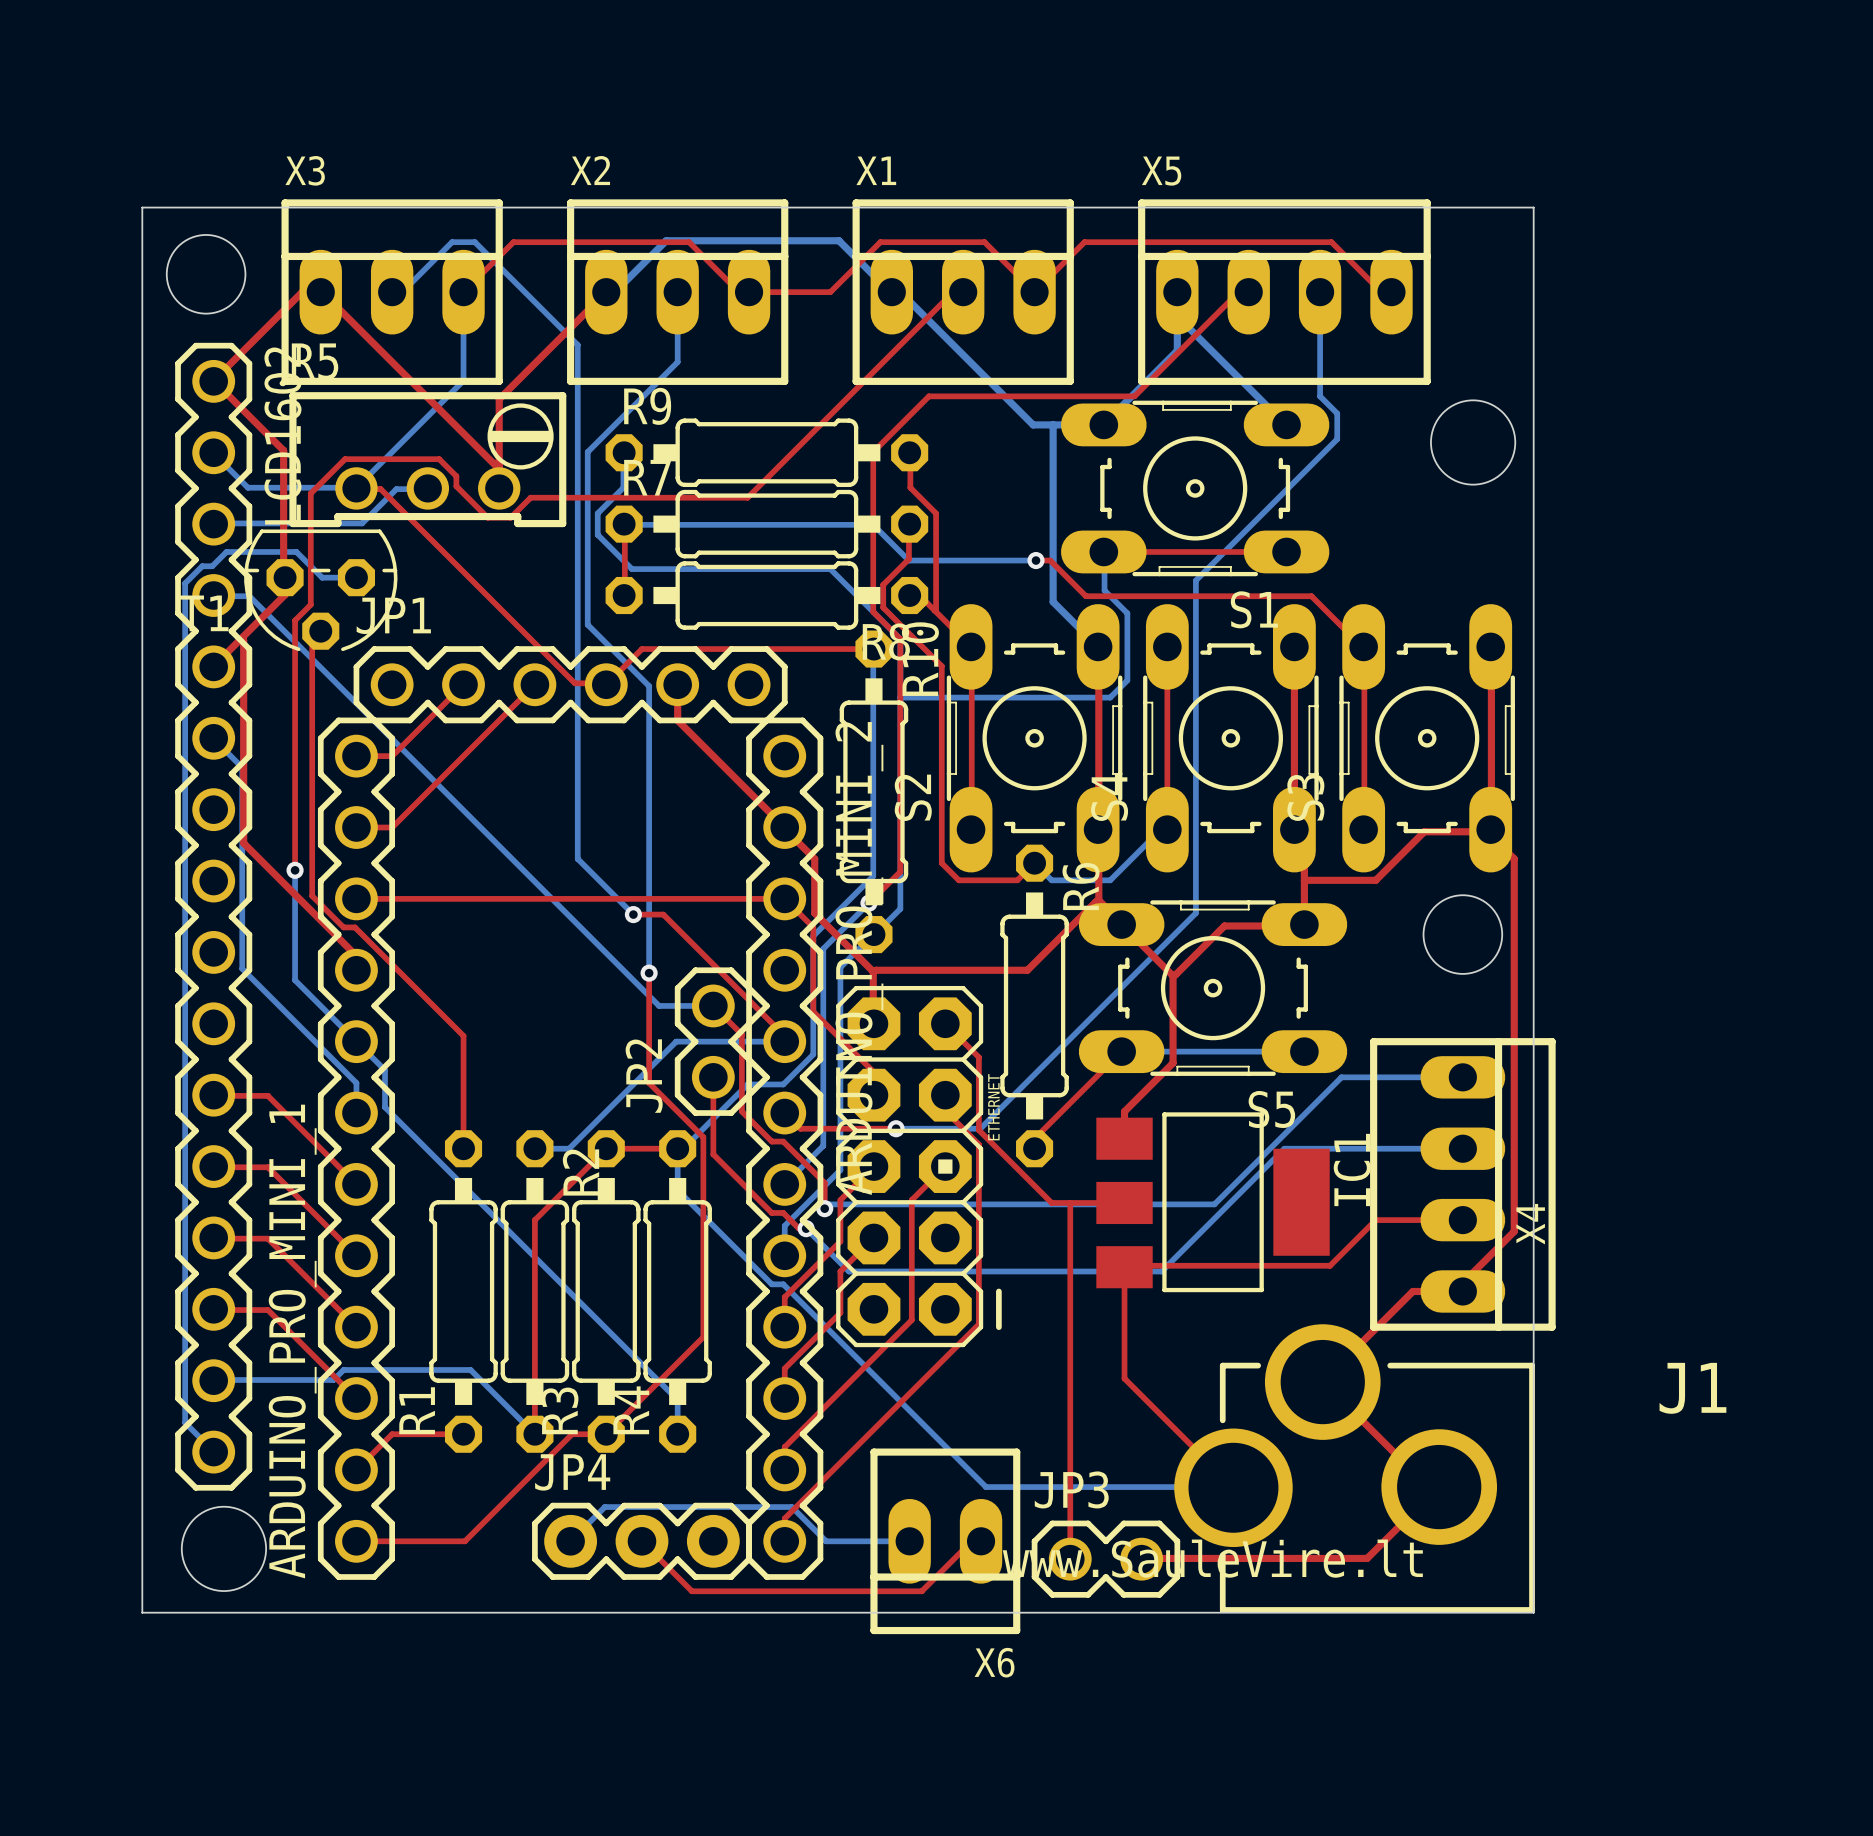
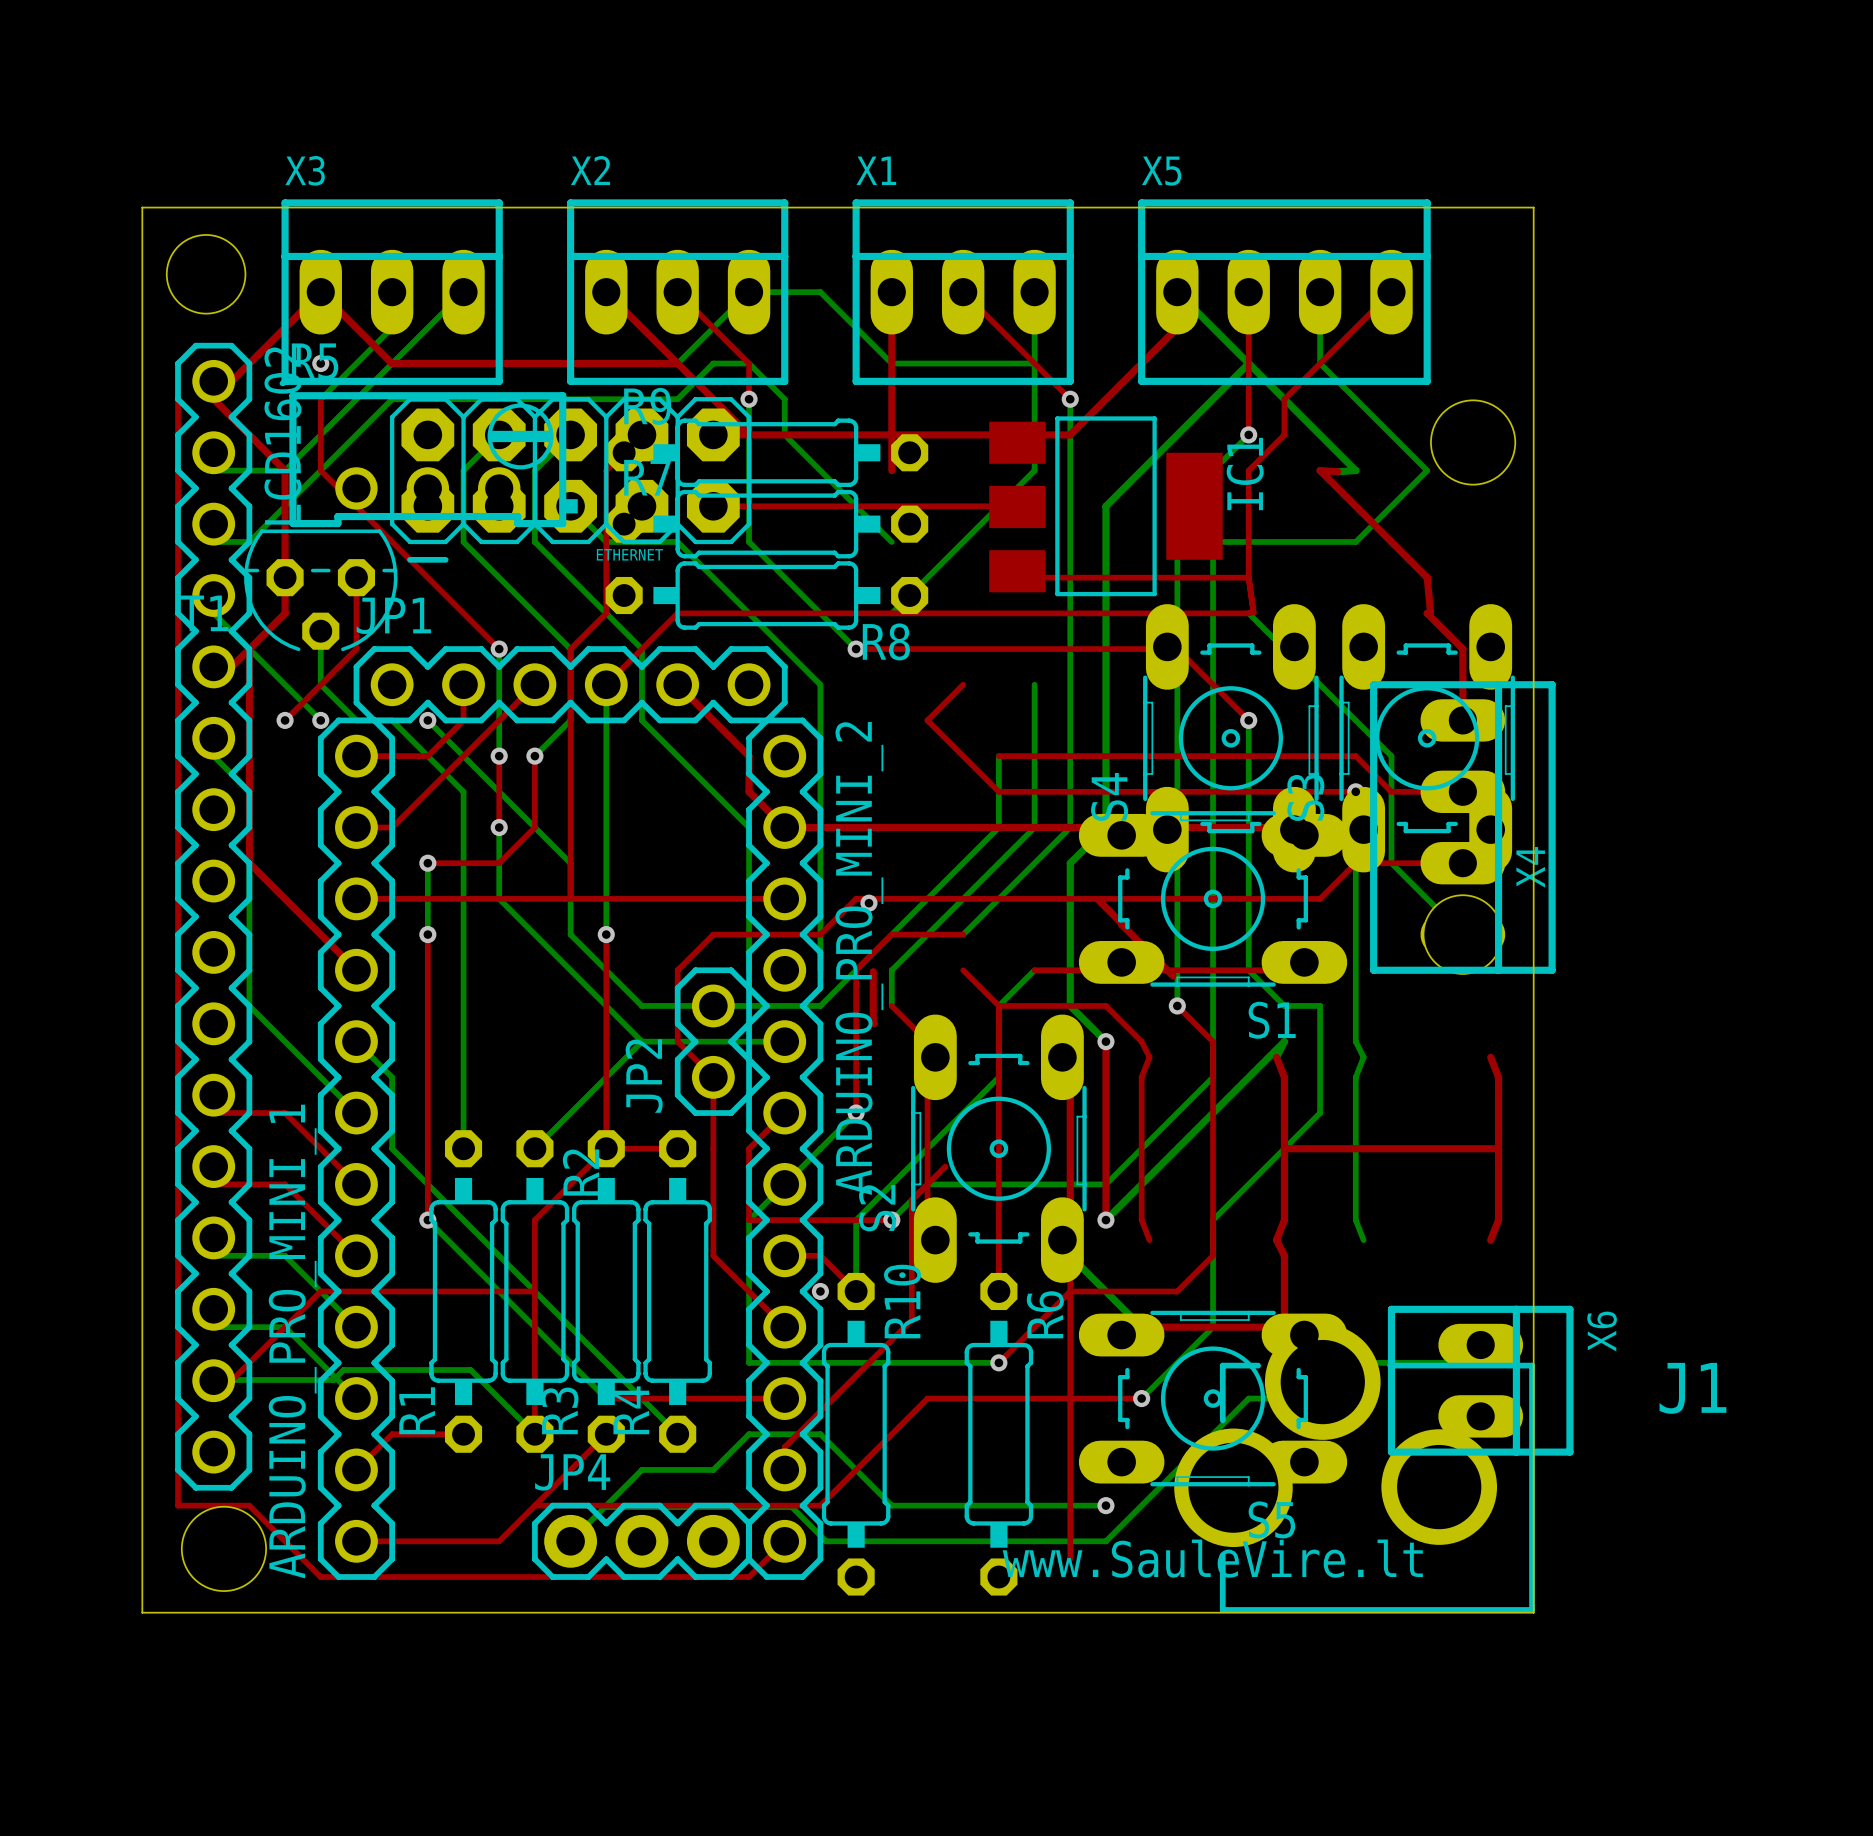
bottom track: (392, 292) (402, 292) (452, 242) (474, 242) (577, 344) (577, 858) (633, 914) -> (392, 292) (392, 327) (320, 399)
top track: (463, 292) (513, 242) (689, 242) (737, 290) (749, 292) (830, 292) (880, 242) (984, 242) (1034, 292) (1084, 242) (1331, 242) (1381, 292) (1391, 292) -> (1248, 577) (1248, 470) (1284, 434) (1284, 399) (1391, 292)
bottom track: (463, 292) (463, 380) (356, 488) (247, 487) (213, 452) -> (463, 292) (285, 470) (213, 470)
top track: (606, 292) (499, 399) (499, 488) -> (606, 292) (749, 434)
bottom track: (606, 292) (614, 292) (666, 240) (838, 240) (888, 290) (900, 292) (1033, 424) (1103, 424) (1177, 350) (1177, 292) (1180, 319) (1286, 424) -> none
top track: none -> (677, 292) (749, 363) (749, 399)
bottom track: (677, 292) (677, 362) (587, 452) (587, 624) (649, 686) (649, 973) -> none
top track: none -> (891, 292) (891, 470)
top track: (963, 292) (953, 292) (747, 497) (530, 497) (510, 517) (487, 517) (456, 486) (456, 476) (439, 459) (345, 459) (310, 493) (310, 604) (295, 620) (295, 870) -> (963, 292) (1070, 399)
bottom track: none -> (1034, 292) (1034, 470) (891, 613)
top track: none -> (1177, 292) (1177, 327) (1070, 434) (1034, 434) (1017, 442) (998, 434) (713, 434)
bottom track: none -> (1177, 292) (1355, 470) (1337, 471)
top track: (1248, 292) (1238, 292) (1134, 396) (928, 396) (873, 452) (873, 611) (900, 639) (900, 871) (868, 903) -> (1248, 292) (1248, 434)
via: none -> (320, 363)
bottom track: none -> (392, 363) (677, 363) (749, 292) (820, 292) (891, 363) (1034, 363)
bottom track: none -> (1248, 363) (1105, 506) (1105, 827)
bottom track: (1320, 363) (1320, 396) (1337, 413) (1337, 439) (1195, 580) (1195, 913) (980, 1128) (896, 1128) -> (1320, 363) (1427, 470) (1355, 541) (1213, 541) (1213, 1077) (1105, 1184) (927, 1184) (891, 1220)
top track: none -> (320, 399) (320, 470) (499, 649)
bottom track: none -> (749, 399) (749, 541) (856, 649)
via: none -> (749, 399)
bottom track: none -> (1070, 399) (1070, 827) (963, 934)
via: none -> (1070, 399)
bottom track: (1053, 424) (1053, 601) (1098, 646) -> none
bottom track: none -> (499, 434) (463, 470) (463, 541) (570, 649) (570, 720) (534, 756)
bottom track: none -> (570, 434) (534, 470) (534, 541) (641, 649) (641, 720) (749, 827) (749, 970)
top track: none -> (641, 434) (606, 470) (606, 613) (570, 649) (570, 898)
bottom track: none -> (1248, 434) (1177, 506) (1177, 1005)
via: none -> (1248, 434)
bottom track: (624, 452) (623, 487) (597, 513) (597, 534) (631, 569) (830, 569) (900, 639) (900, 908) (840, 967) (840, 1170) (784, 1225) (784, 1255) -> none
top track: (909, 452) (910, 487) (936, 513) (934, 610) -> none
top track: (499, 466) (496, 466) (323, 293) (302, 292) (213, 380) (283, 450) (285, 577) -> (677, 363) (392, 363) (320, 292) (213, 399) (285, 470) (285, 577)
top track: none -> (1337, 471) (1320, 470) (1427, 577) (1430, 612) (1427, 613) (1462, 649) (1462, 720)
ETHERNET: none -> (570, 479)
top track: (356, 488) (380, 489) (574, 683) (606, 684) -> none
bottom track: (427, 488) (396, 489) (362, 523) (213, 524) -> none
S1 position: (1195, 488) -> (1213, 898)
bottom track: none -> (570, 506) (606, 541) (677, 541) (820, 684) (820, 970)
top track: none -> (713, 506) (1017, 507)
top track: (624, 524) (624, 595) -> none
bottom track: (624, 524) (873, 524) (908, 560) (1036, 560) -> none
top track: (909, 524) (908, 559) (883, 584) (883, 607) (941, 666) (941, 863) (958, 880) (1017, 880) (1034, 863) -> none
bottom track: none -> (213, 541) (249, 541) (392, 399) (677, 399) (713, 363) (749, 363) (784, 399) (784, 434) (891, 541)
top track: (1103, 551) (1286, 551) -> none
bottom track: (1103, 551) (1104, 590) (1127, 613) (1127, 680) (1110, 697) (900, 697) -> none
top track: (1036, 560) (1050, 560) (1085, 596) (1311, 596) (1364, 647) (1363, 829) -> none
via: (1036, 560) -> none
top track: none -> (1017, 571) (1034, 577) (1248, 577)
top track: none -> (356, 577) (356, 649) (285, 720)
bottom track: (356, 577) (322, 577) (296, 551) (226, 551) (212, 566) (202, 566) (185, 583) (185, 1422) (213, 1452) -> none
top track: (285, 594) (213, 666) -> (285, 594) (285, 613) (213, 684)
bottom track: (213, 595) (249, 596) (659, 1005) -> (427, 720) (570, 863) (570, 934) (641, 1005) (659, 1005)
top track: (909, 595) (920, 596) (971, 649) (971, 829) -> none
bottom track: none -> (1253, 612) (1248, 613) (1391, 756) (1391, 863) (1462, 934)
bottom track: none -> (213, 613) (320, 720)
top track: (320, 631) (312, 640) (312, 896) (343, 927) (355, 927) (463, 1035) (463, 1148) -> none
bottom track: none -> (320, 631) (320, 684) (356, 720) (392, 720) (463, 791) (463, 1148)
top track: (241, 638) (243, 640) (243, 843) (356, 955) (356, 970) -> (249, 649) (249, 863) (356, 970)
top track: (1098, 646) (1098, 900) (1027, 970) (873, 971) (814, 913) (814, 858) (784, 827) -> (1304, 835) (1284, 827) (1141, 827) (1121, 835) (1105, 827) (784, 827)
top track: (1167, 646) (1167, 829) -> none
top track: (1294, 646) (1294, 830) (1304, 840) (1304, 924) (1224, 926) (1173, 975) (1173, 1063) (1124, 1111) (1124, 1138) -> none
top track: (1490, 646) (1491, 828) (1488, 831) (1424, 831) (1375, 880) (1304, 880) -> none
bottom track: none -> (499, 649) (499, 756)
via: none -> (499, 649)
top track: (641, 649) (856, 649) -> (641, 649) (677, 613) (1248, 613) (1253, 612) (1248, 577)
via: none -> (856, 649)
top track: none -> (873, 649) (1177, 649) (1248, 720)
bottom track: (873, 649) (873, 876) (813, 936) (813, 1054) (783, 1084) (747, 1084) (679, 1153) (677, 1148) (677, 1190) (771, 1284) (783, 1284) (986, 1487) (1233, 1487) -> none
top track: (463, 684) (392, 756) -> (463, 684) (463, 720) (427, 756) (392, 756)
bottom track: none -> (606, 684) (606, 934)
top track: (677, 684) (677, 720) (749, 791) -> (677, 684) (749, 756) (749, 791)
top track: none -> (963, 684) (927, 720) (998, 791) (1355, 791)
bottom track: none -> (1034, 684) (1034, 827) (891, 970) (891, 1005)
via: none -> (285, 720)
via: none -> (320, 720)
via: none -> (427, 720)
via: none -> (1248, 720)
bottom track: (213, 738) (242, 767) (242, 968) (356, 1083) (356, 1113) -> (213, 756) (249, 791) (249, 1005) (356, 1113)
S2 position: (1034, 738) -> (998, 1148)
top track: none -> (499, 756) (499, 827)
via: none -> (499, 756)
top track: none -> (534, 756) (534, 827) (499, 863) (427, 863)
via: none -> (534, 756)
top track: none -> (998, 756) (1355, 756) (1391, 791) (1462, 791)
bottom track: none -> (998, 756) (998, 827) (820, 1005) (713, 1005)
R10 position: (873, 791) -> (856, 1434)
bottom track: none -> (1355, 791) (1355, 1041) (1363, 1057) (1355, 1077) (1355, 1220) (1363, 1240)
via: none -> (1355, 791)
bottom track: none -> (499, 827) (499, 898) (641, 1041)
via: none -> (499, 827)
bottom track: none -> (1105, 827) (1070, 863) (1070, 1005) (1105, 1041)
bottom track: (1167, 829) (1160, 830) (1110, 880) (1051, 880) (1034, 863) -> none
top track: (1490, 829) (1489, 834) (1514, 858) (1514, 1231) (1464, 1281) (1462, 1291) (1412, 1291) (1322, 1382) (1431, 1489) (1439, 1487) (1367, 1558) (1141, 1559) -> none
bottom track: none -> (427, 863) (427, 934)
via: none -> (427, 863)
top track: none -> (1462, 863) (1355, 863) (1320, 898) (856, 898) (820, 934) (713, 934) (677, 970) (677, 1041) (713, 1077)
bottom track: (295, 870) (295, 980) (356, 1041) -> none
via: (295, 870) -> none
top track: (784, 898) (813, 927) (813, 1011) (873, 1071) (873, 1095) -> none
bottom track: (868, 903) (823, 948) (823, 1145) -> (856, 1113) (823, 1145)
top track: (633, 914) (663, 914) (784, 1035) (784, 1041) -> none
via: (633, 914) -> none
top track: none -> (427, 934) (427, 1220)
via: none -> (427, 934)
top track: none -> (606, 934) (606, 1148)
via: none -> (606, 934)
top track: none -> (963, 934) (891, 934) (856, 970) (856, 1113)
top track: none -> (1304, 962) (1284, 970) (1141, 970) (1121, 962) (1105, 970) (1034, 970)
top track: none -> (963, 970) (998, 1005)
bottom track: none -> (1034, 970) (998, 1005) (998, 1077) (856, 1220) (856, 1291)
top track: (649, 973) (649, 1083) (703, 1137) (703, 1337) (606, 1434) (572, 1434) (464, 1541) -> (606, 1434) (499, 1541) (464, 1541)
via: (649, 973) -> none
S5 position: (1213, 988) -> (1213, 1398)
top track: (713, 1005) (741, 1034) (741, 1111) (771, 1141) (783, 1141) (824, 1182) (824, 1208) -> none
top track: none -> (891, 1005) (927, 1041) (935, 1057) (927, 1077) (927, 1220) (935, 1240)
top track: none -> (998, 1005) (1105, 1005) (1141, 1041) (1149, 1057) (1141, 1077) (1141, 1220) (1149, 1240)
top track: none -> (998, 1005) (998, 1291)
R6 position: (1034, 1005) -> (998, 1434)
top track: none -> (1177, 1005) (1213, 1041) (1213, 1255) (1177, 1291) (1070, 1291) (998, 1362)
via: none -> (1177, 1005)
top track: (945, 1023) (978, 1057) (978, 1130) (1051, 1202) (1124, 1202) -> none
bottom track: none -> (641, 1041) (676, 1041)
bottom track: (676, 1041) (569, 1148) (534, 1148) -> (641, 1041) (534, 1148)
top track: none -> (1105, 1041) (1105, 1220)
via: none -> (1105, 1041)
top track: (1121, 1051) (1034, 1138) (1034, 1148) -> none
bottom track: (1121, 1051) (1304, 1051) -> none
top track: none -> (1062, 1057) (1070, 1077) (1070, 1202)
top track: none -> (1276, 1057) (1284, 1077) (1284, 1220) (1276, 1240) (1284, 1255) (1284, 1327)
bottom track: none -> (1276, 1057) (1284, 1041) (1105, 1220)
top track: none -> (1490, 1057) (1498, 1077) (1498, 1220) (1490, 1240)
bottom track: (385, 1070) (385, 1107) (677, 1399) (677, 1434) -> (385, 1070) (392, 1077) (392, 1148) (677, 1434)
bottom track: (1462, 1077) (1341, 1077) (1214, 1204) (829, 1204) (824, 1208) -> none
top track: (213, 1095) (267, 1095) (285, 1113) -> (213, 1113) (285, 1113)
top track: (945, 1095) (946, 1111) (978, 1144) (978, 1324) (784, 1518) (784, 1541) -> (178, 363) (178, 1505) (249, 1505) (320, 1577) (749, 1577) (784, 1541)
top track: (784, 1113) (800, 1128) (896, 1128) -> (784, 1113) (749, 1148) (749, 1220) (891, 1220)
via position: (896, 1128) -> (856, 1113)
top track: none -> (1284, 1148) (1498, 1148)
bottom track: (1284, 1148) (1462, 1148) -> (1284, 1148) (1320, 1113) (1320, 1005) (1284, 1005) (1248, 970) (1248, 720)
top track: (713, 1154) (771, 1212) (783, 1212) (799, 1228) (806, 1228) -> (713, 1154) (713, 1255) (784, 1327)
top track: (213, 1166) (267, 1167) (285, 1184) -> (213, 1184) (285, 1184)
top track: (873, 1166) (840, 1200) (840, 1241) (784, 1297) (784, 1327) -> none
ETHERNET: (918, 1166) -> none
bottom track: none -> (784, 1184) (749, 1220) (749, 1362) (998, 1362)
X4 position: (1462, 1184) -> (1462, 827)
IC1 position: (1213, 1202) -> (1105, 506)
via: (824, 1208) -> none
bottom track: none -> (427, 1220) (606, 1398)
via: none -> (427, 1220)
via: none -> (891, 1220)
via: none -> (1105, 1220)
bottom track: (1213, 1220) (1161, 1271) (848, 1271) (806, 1228) -> (1213, 1220) (1213, 1327) (1141, 1398)
top track: (1462, 1220) (1375, 1220) (1330, 1265) (1124, 1267) (1124, 1378) (1233, 1487) -> none
via: (806, 1228) -> none
top track: (213, 1237) (267, 1238) (356, 1327) -> none
top track: (873, 1237) (840, 1271) (840, 1312) (784, 1368) (784, 1398) -> (606, 1398) (784, 1398)
bottom track: none -> (1062, 1240) (1070, 1255) (1141, 1327) (1121, 1335)
bottom track: none -> (213, 1255) (285, 1255) (356, 1327)
top track: none -> (784, 1255) (820, 1255) (856, 1291)
top track: none -> (534, 1291) (320, 1291) (213, 1398)
via: none -> (820, 1291)
top track: (213, 1309) (267, 1310) (356, 1398) -> none
bottom track: none -> (213, 1327) (285, 1327) (356, 1398)
top track: none -> (1284, 1327) (1141, 1327) (1121, 1335)
bottom track: none -> (1480, 1345) (1462, 1362) (1355, 1362) (1320, 1398) (1248, 1398) (1105, 1541) (909, 1541)
via: none -> (998, 1362)
top track: none -> (1141, 1398) (927, 1398) (820, 1505) (534, 1505)
via: none -> (1141, 1398)
bottom track: none -> (1105, 1505) (891, 1505) (820, 1434) (749, 1434) (713, 1469) (641, 1469) (604, 1507)
via: none -> (1105, 1505)
top track: (641, 1541) (691, 1591) (921, 1591) (971, 1541) (981, 1541) -> none
X6 rotation: 0° (945, 1541) -> 90° counterclockwise (1480, 1380)
X6 position: (945, 1541) -> (1480, 1380)
JP3: (1105, 1559) -> none

